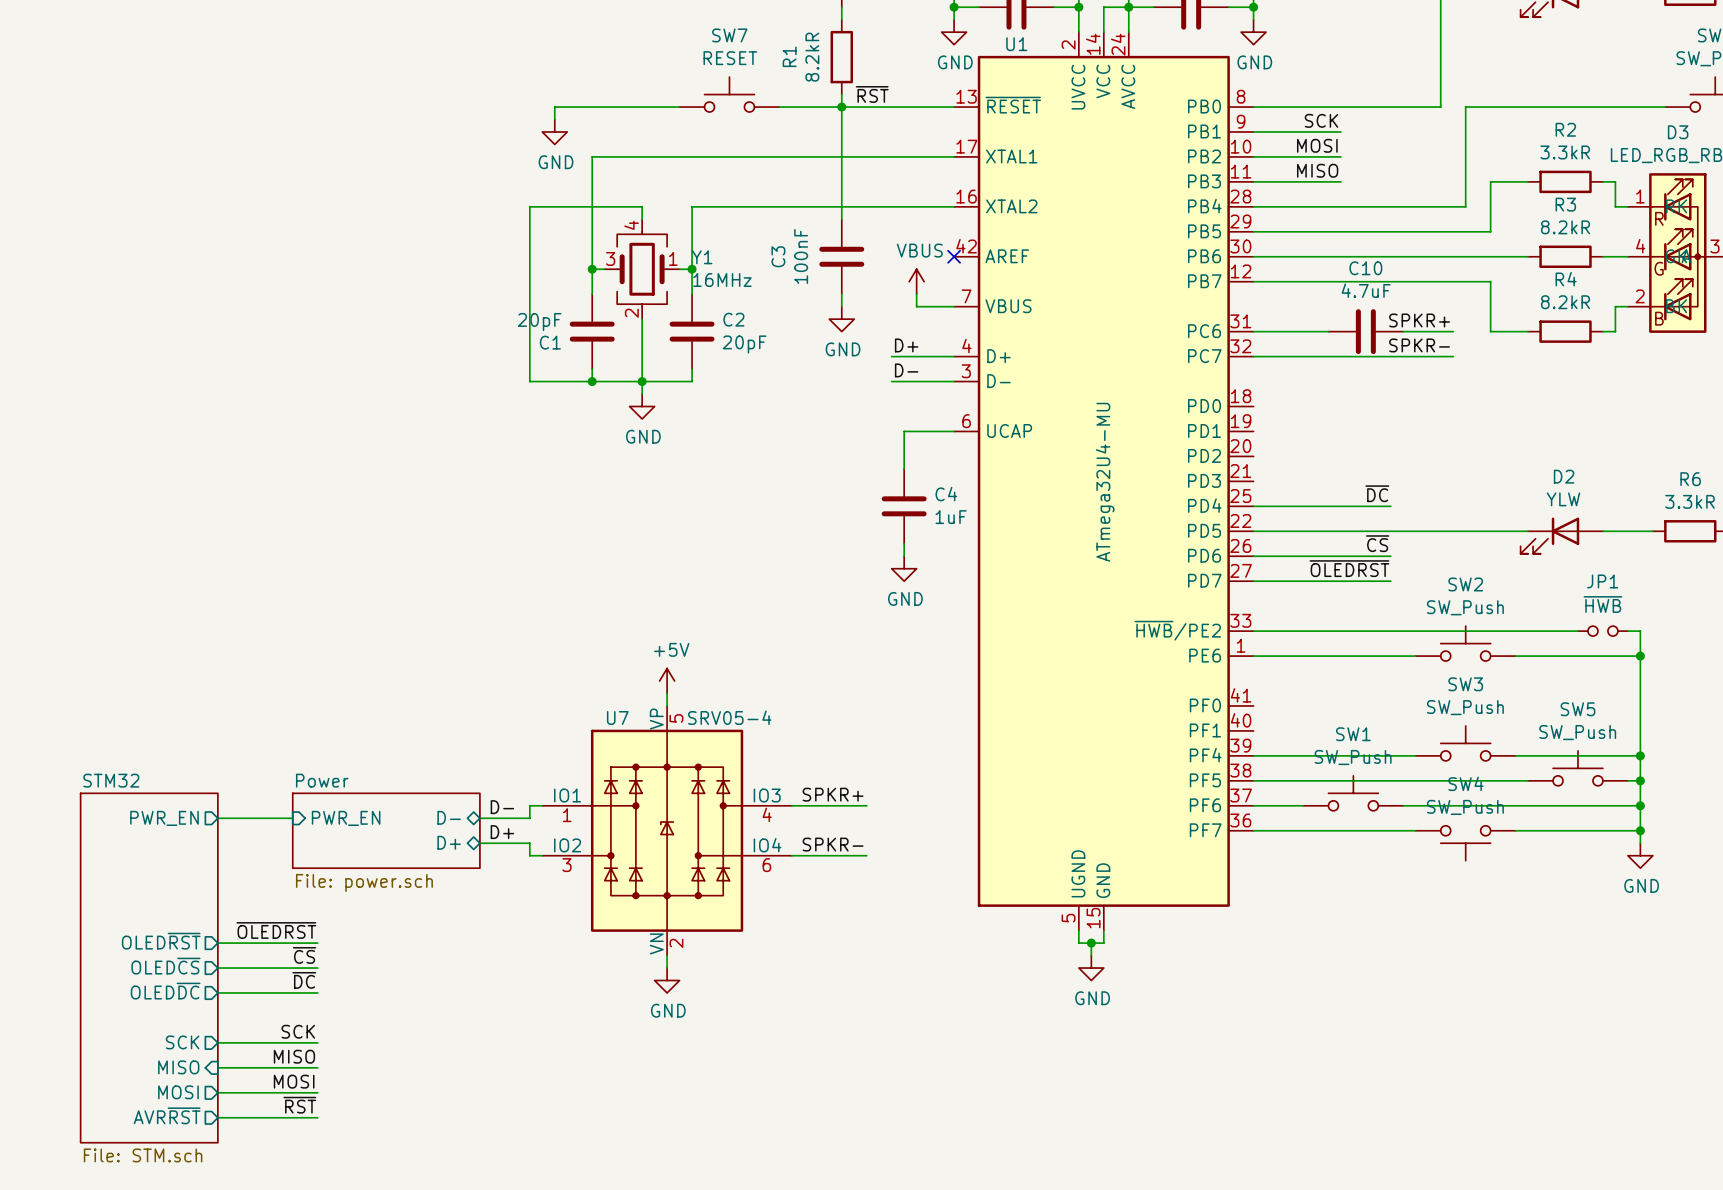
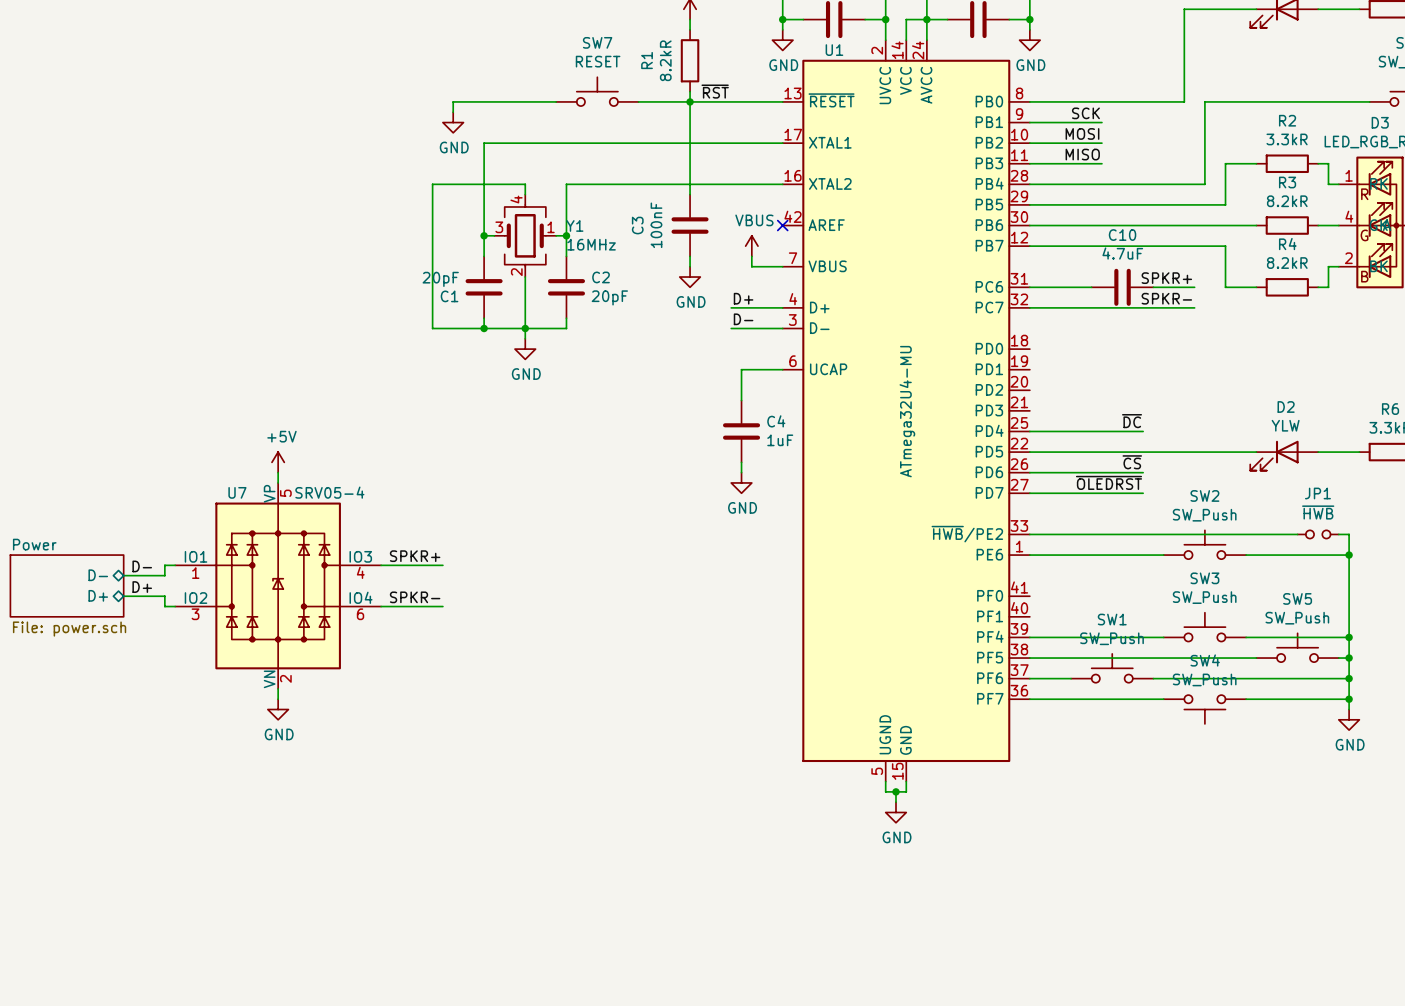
power symbol: none -> +5V (278, 462)
wire: none -> (278, 472) (278, 482)
label: none -> SPKR+ (415, 556)
wire: none -> (175, 565) (164, 565) (164, 575) (123, 575)
wire: none -> (381, 565) (442, 565)
label: none -> D- (142, 566)
sheet pin: none -> D- (98, 575)
power symbol: +5V (667, 681) -> none
sheet Power: none -> File: power.sch (67, 585)
wire: (667, 693) (667, 705) -> none
label: none -> D+ (142, 587)
sheet pin: none -> D+ (98, 595)
wire: none -> (123, 596) (164, 596) (164, 606) (175, 606)
label: none -> SPKR- (415, 597)
wire: none -> (381, 606) (442, 606)
label: SPKR+ (833, 794) -> none
wire: (542, 805) (529, 805) (529, 818) (479, 818) -> none
wire: (791, 805) (866, 805) -> none
label: D- (502, 807) -> none
sheet pin: D- (449, 817) -> none
sheet pin: PWR_EN (164, 818) -> none
wire: (217, 818) (292, 818) -> none
wire: none -> (278, 688) (278, 699)
sheet pin: PWR_EN (346, 818) -> none
sheet Power: File: power.sch (386, 830) -> none
U7 position: (667, 830) -> (278, 585)
label: D+ (502, 832) -> none
sheet pin: D+ (449, 842) -> none
power symbol: none -> GND (278, 709)
wire: (479, 843) (529, 843) (529, 855) (542, 855) -> none
label: SPKR- (833, 844) -> none
wire: (791, 855) (866, 855) -> none
label: ~{OLEDRST} (276, 930) -> none
sheet pin: OLED~{RST} (161, 941) -> none
wire: (217, 943) (317, 943) -> none
label: ~{CS} (304, 955) -> none
wire: (667, 955) (667, 968) -> none
sheet pin: OLED~{CS} (165, 966) -> none
sheet STM32: File: STM.sch (149, 968) -> none
wire: (217, 968) (317, 968) -> none
label: ~{DC} (304, 980) -> none
power symbol: GND (667, 980) -> none
sheet pin: OLED~{DC} (165, 991) -> none
wire: (217, 992) (317, 992) -> none
label: SCK (298, 1031) -> none
sheet pin: SCK (182, 1042) -> none
wire: (217, 1042) (317, 1042) -> none
label: MISO (294, 1056) -> none
sheet pin: MISO (178, 1067) -> none
wire: (217, 1067) (317, 1067) -> none
label: MOSI (294, 1081) -> none
sheet pin: MOSI (178, 1092) -> none
wire: (217, 1092) (317, 1092) -> none
label: ~{RST} (299, 1105) -> none
sheet pin: AVR~{RST} (167, 1115) -> none
wire: (217, 1117) (317, 1117) -> none

